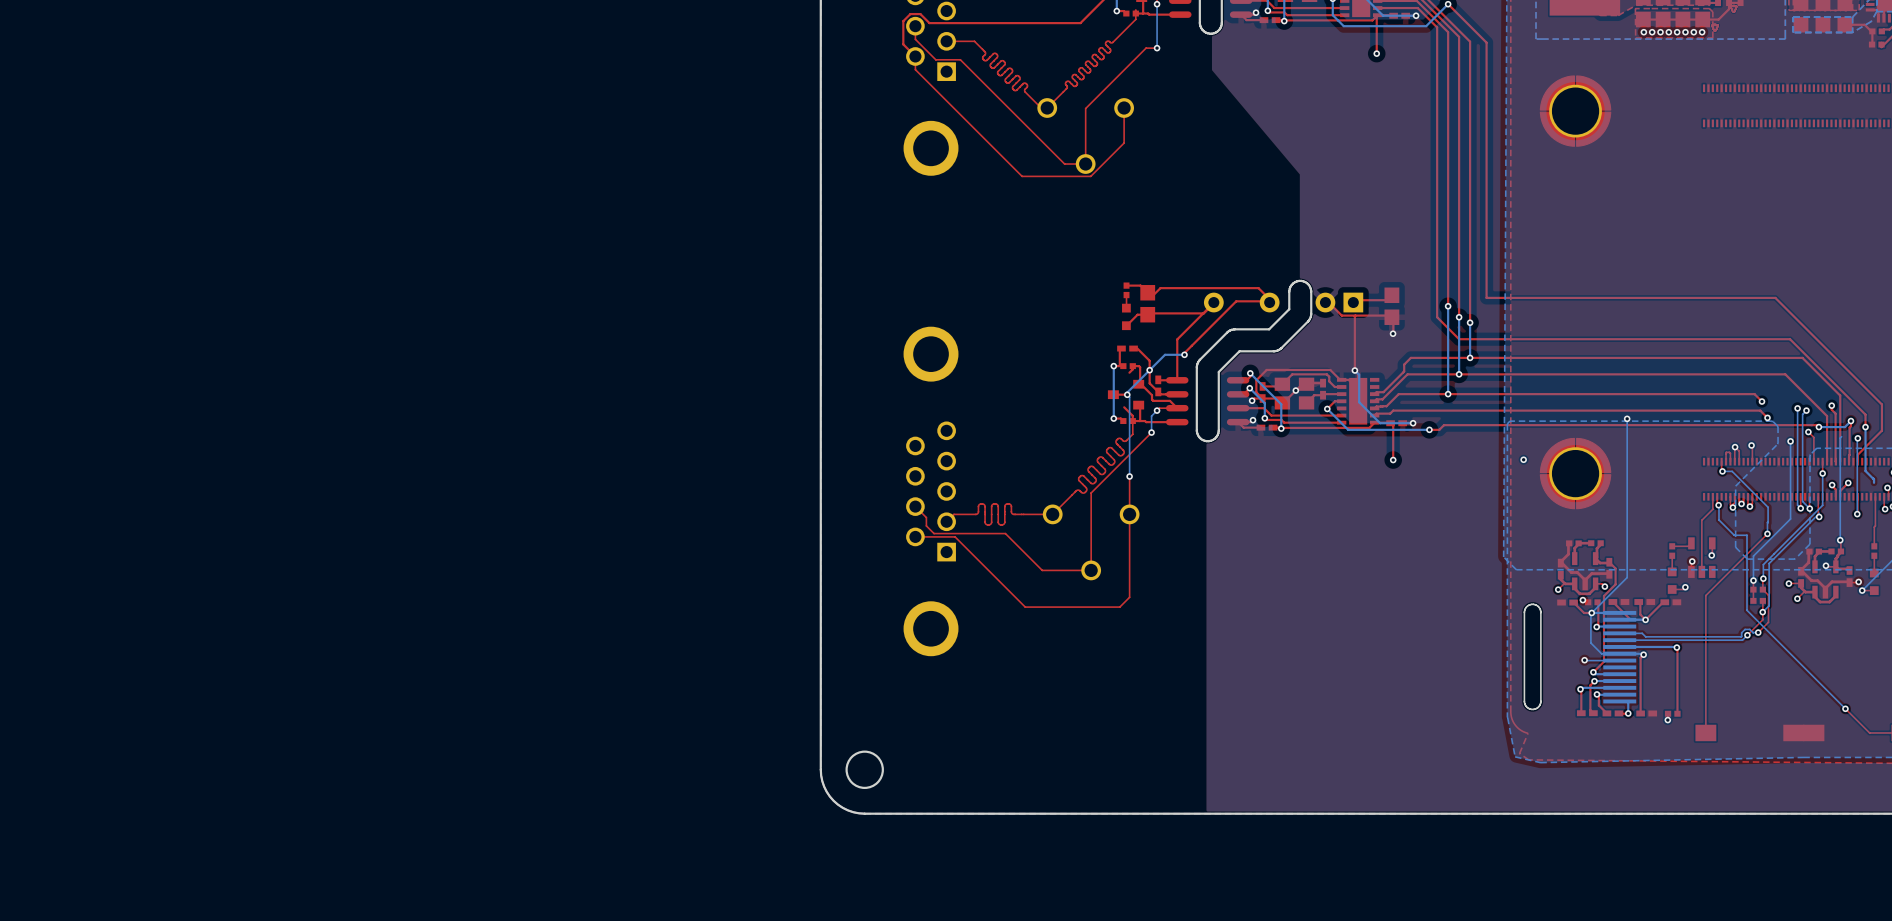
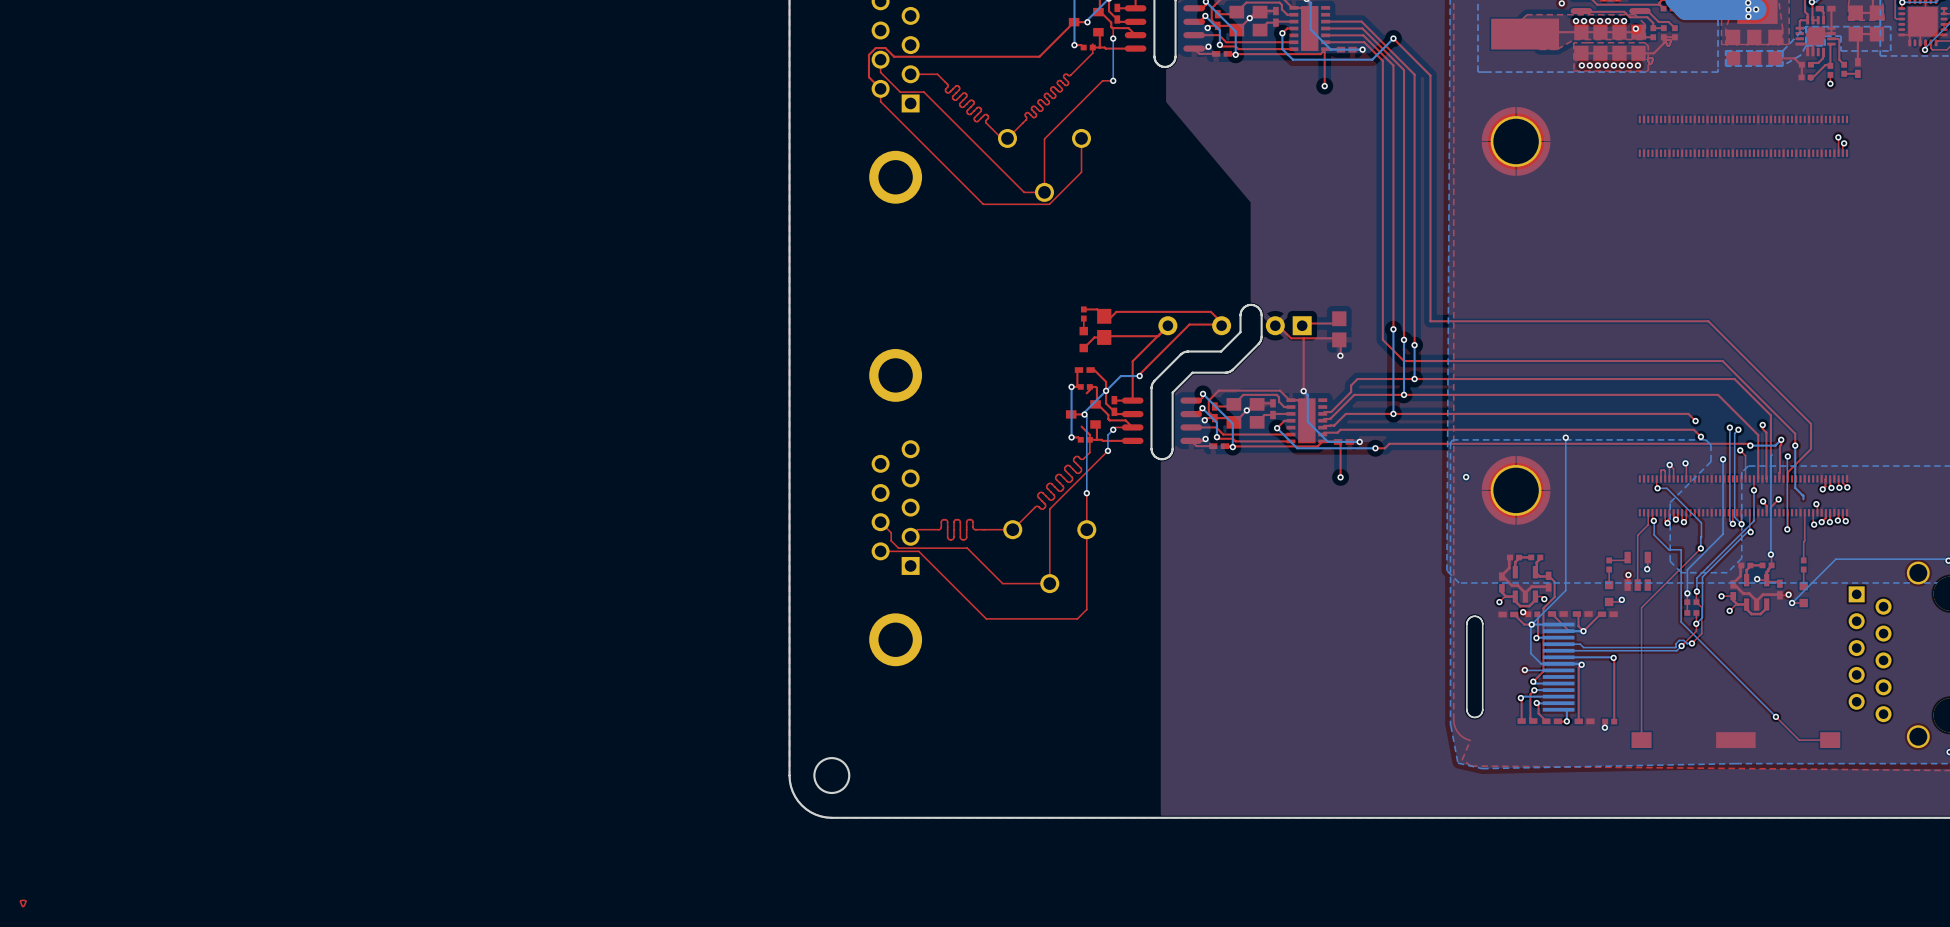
top zone outline: none -> (23, 900) (20, 900) (22, 906) (26, 900) (23, 900)

